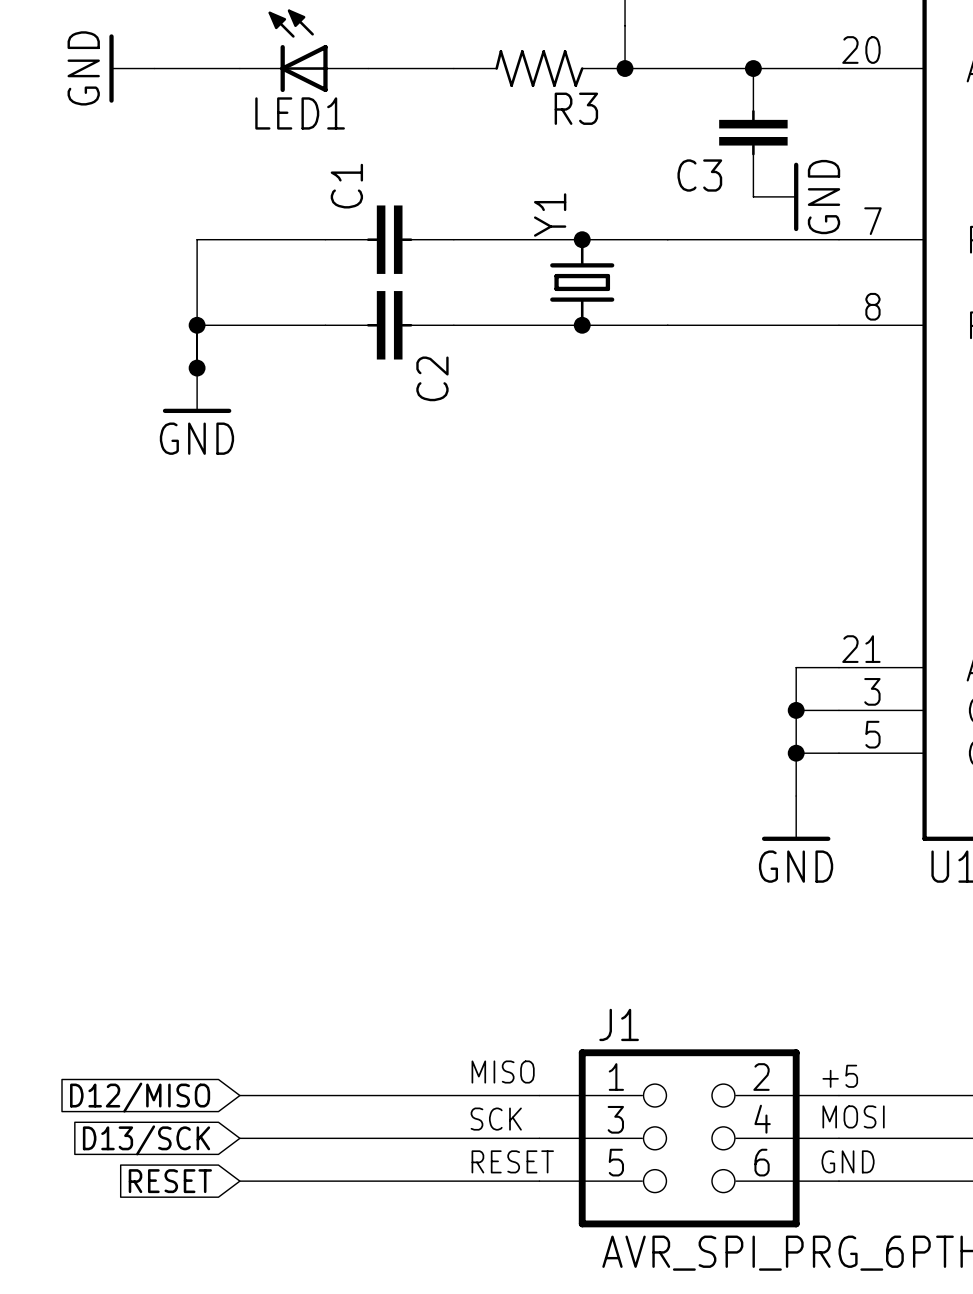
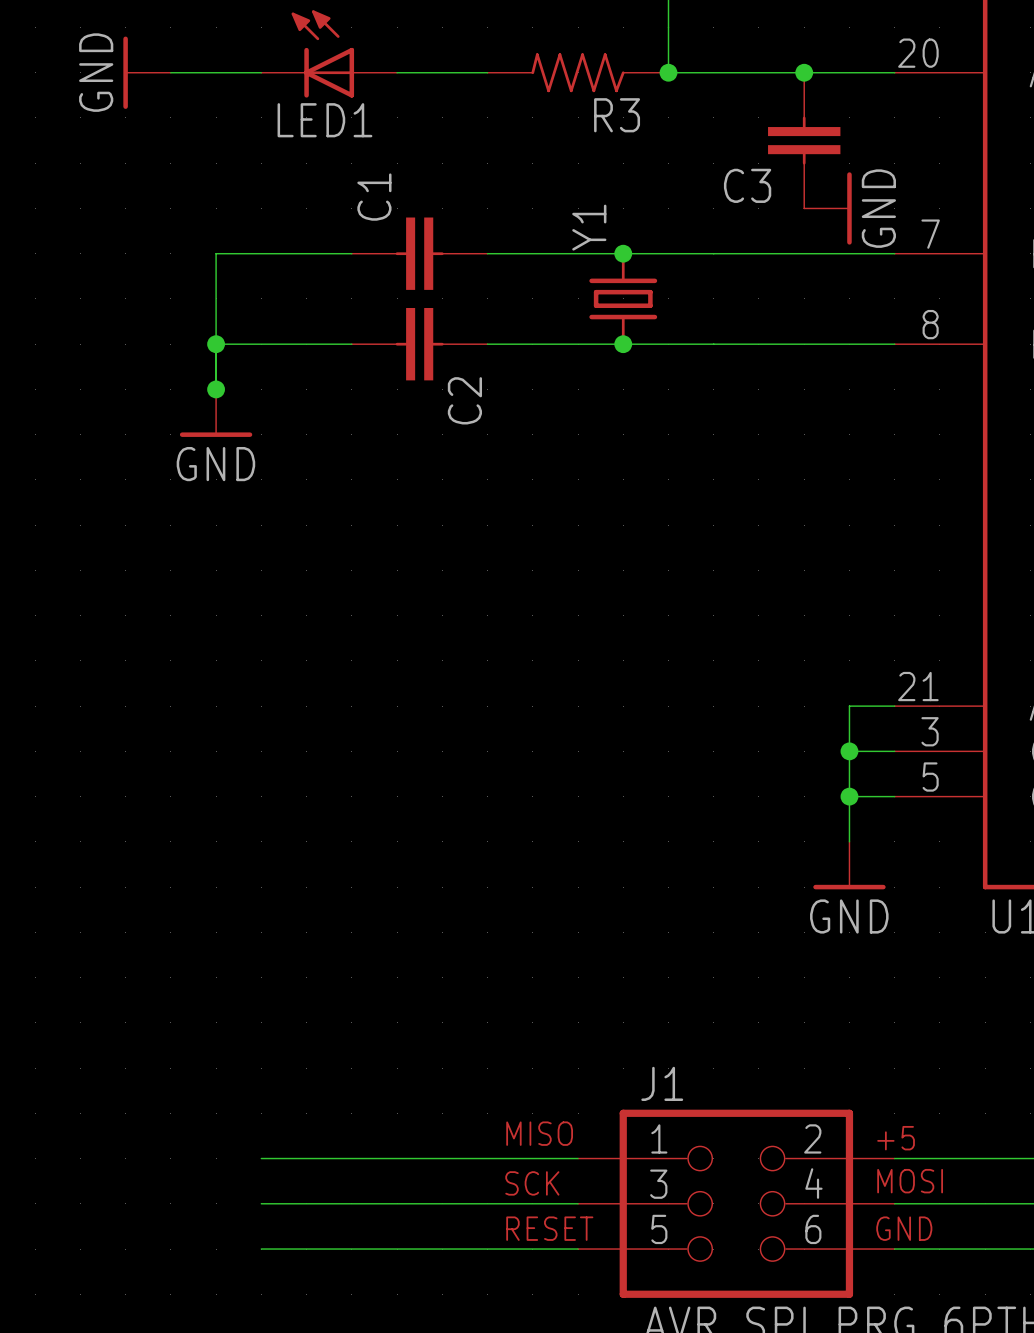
global label: D12/MISO (140, 1097) -> none
global label: D13/SCK (146, 1140) -> none
global label: RESET (170, 1181) -> none

